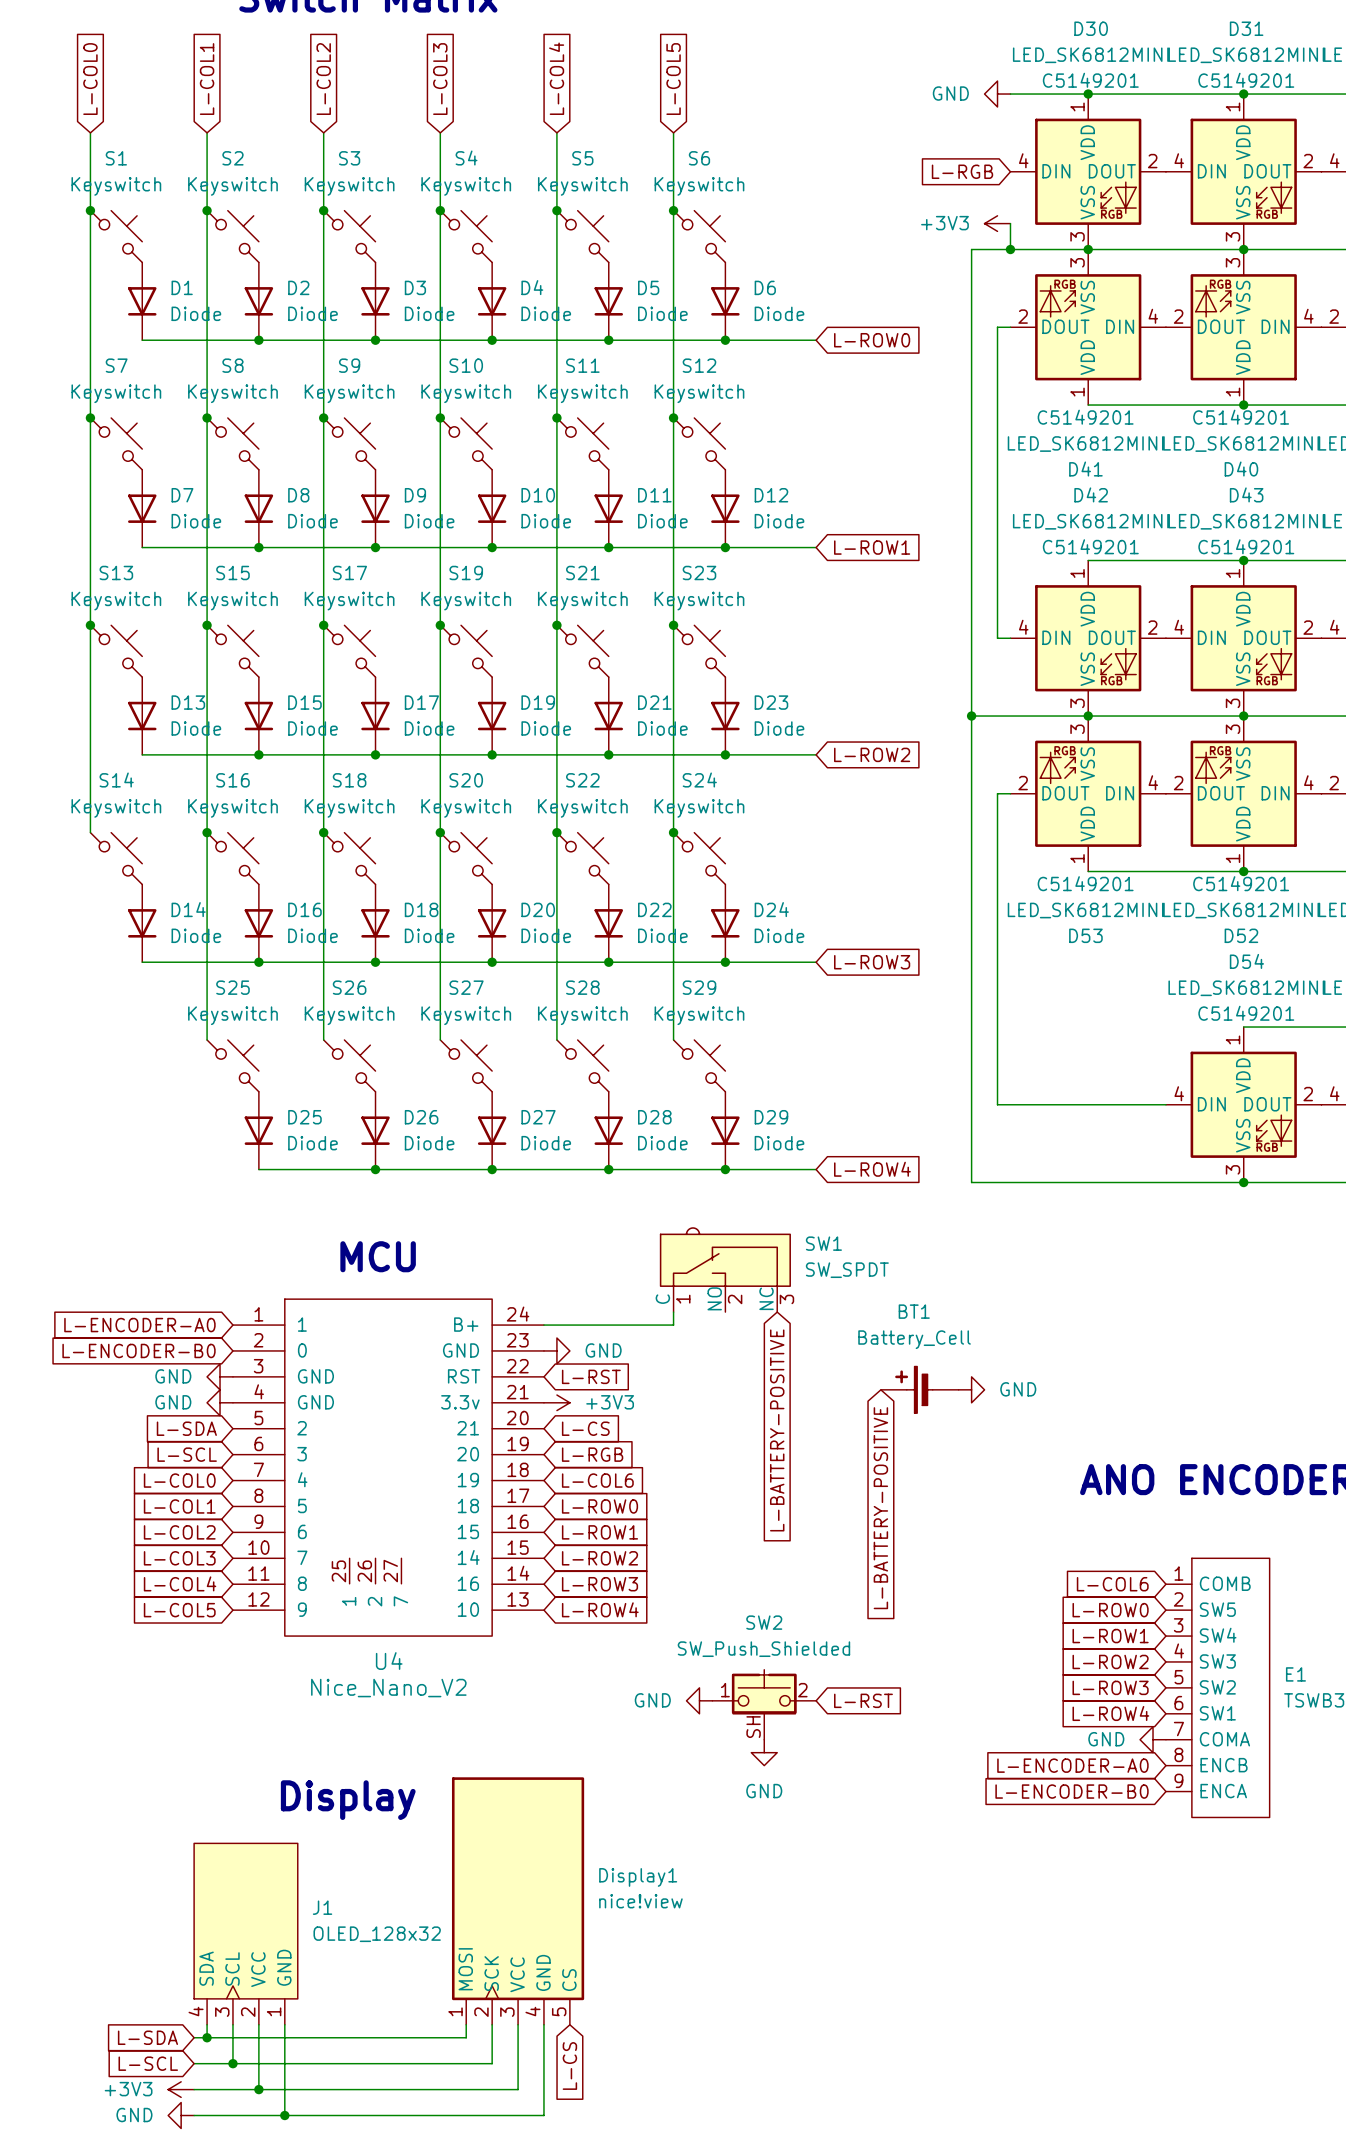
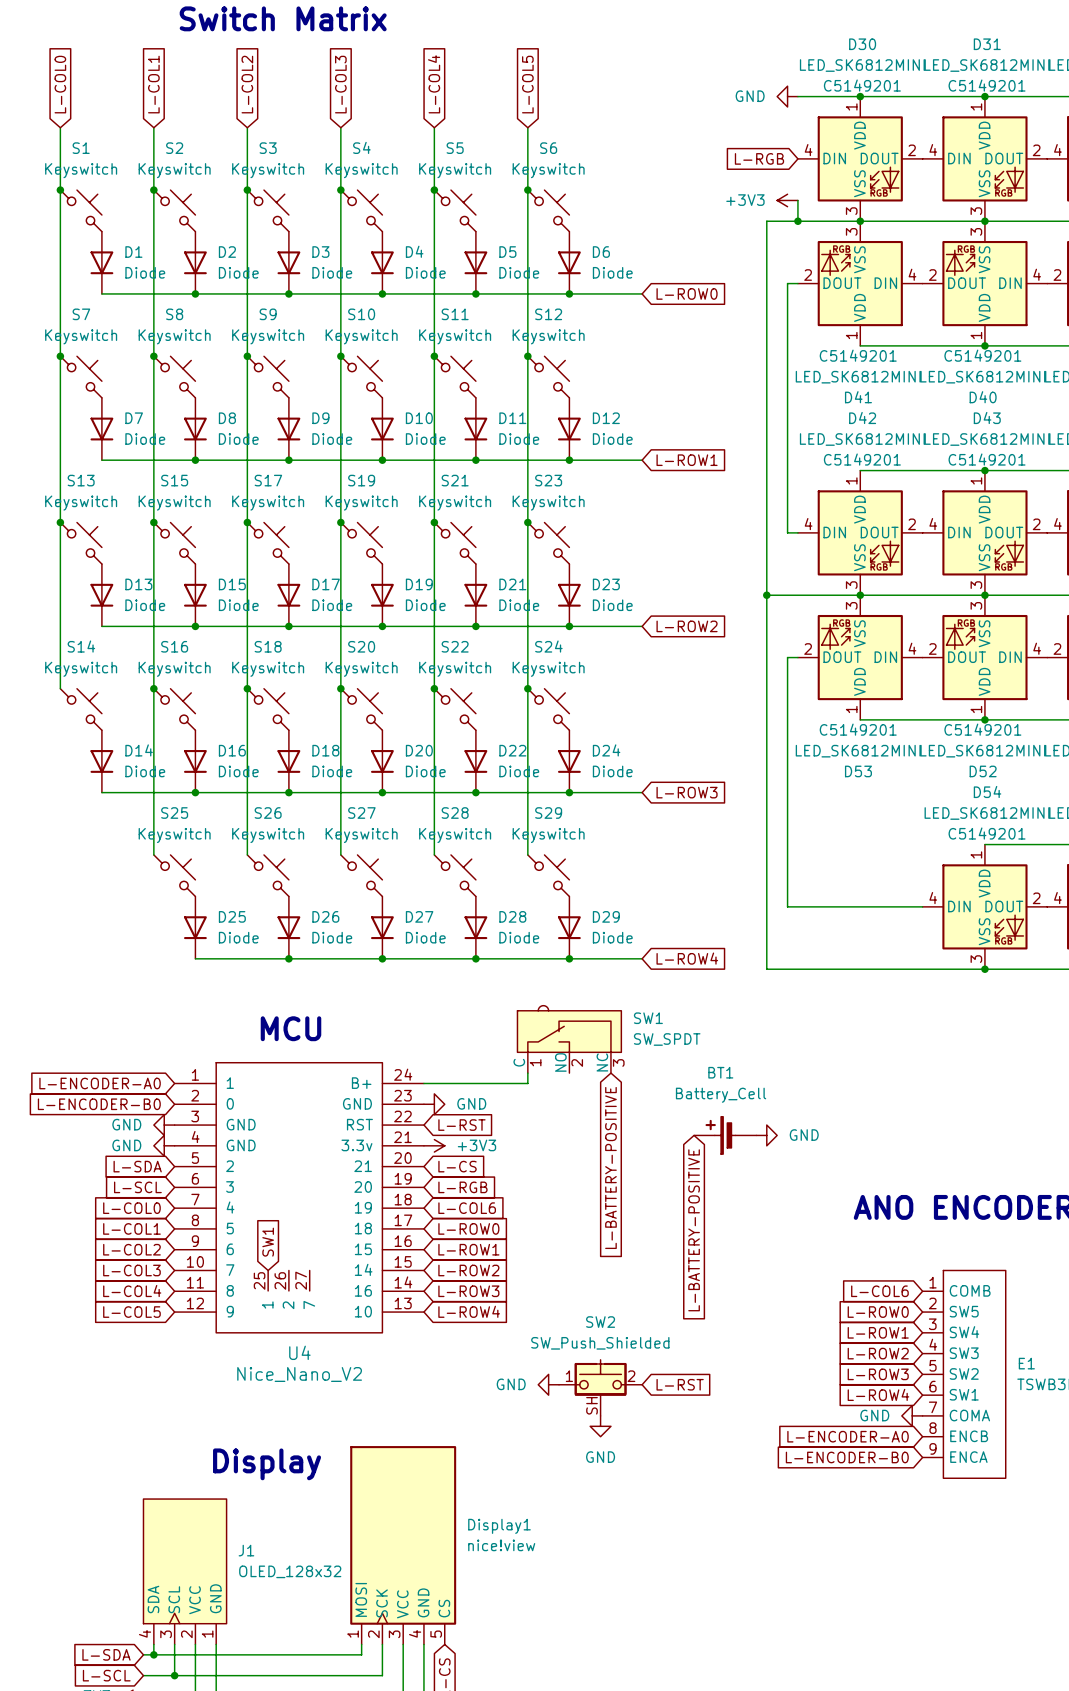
global label: none -> SW1 (268, 1242)

